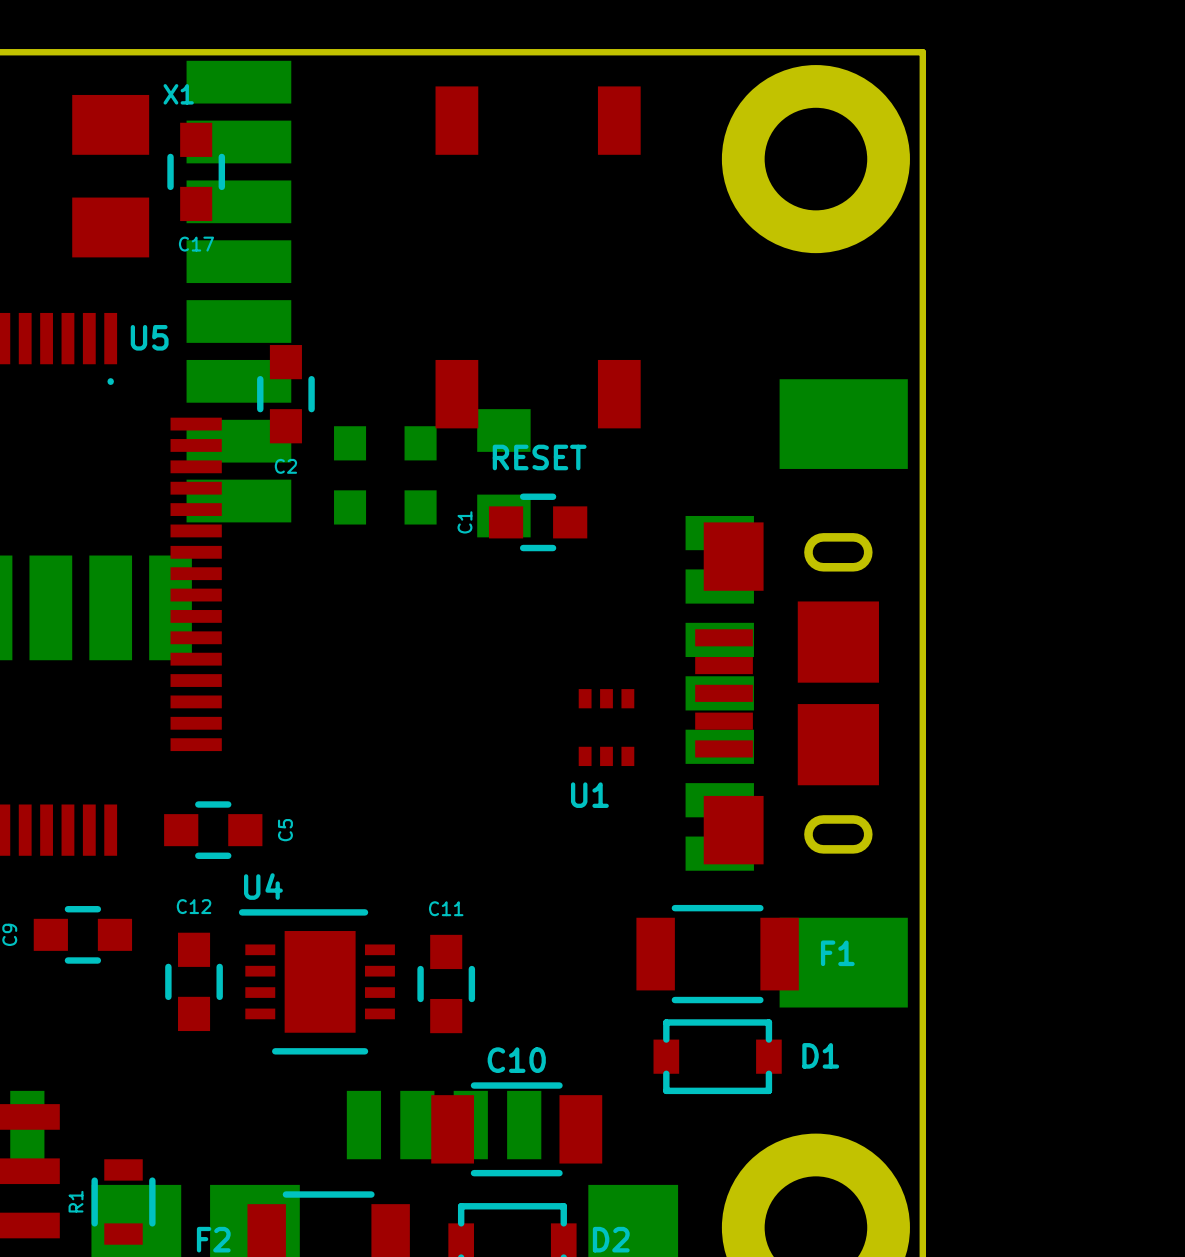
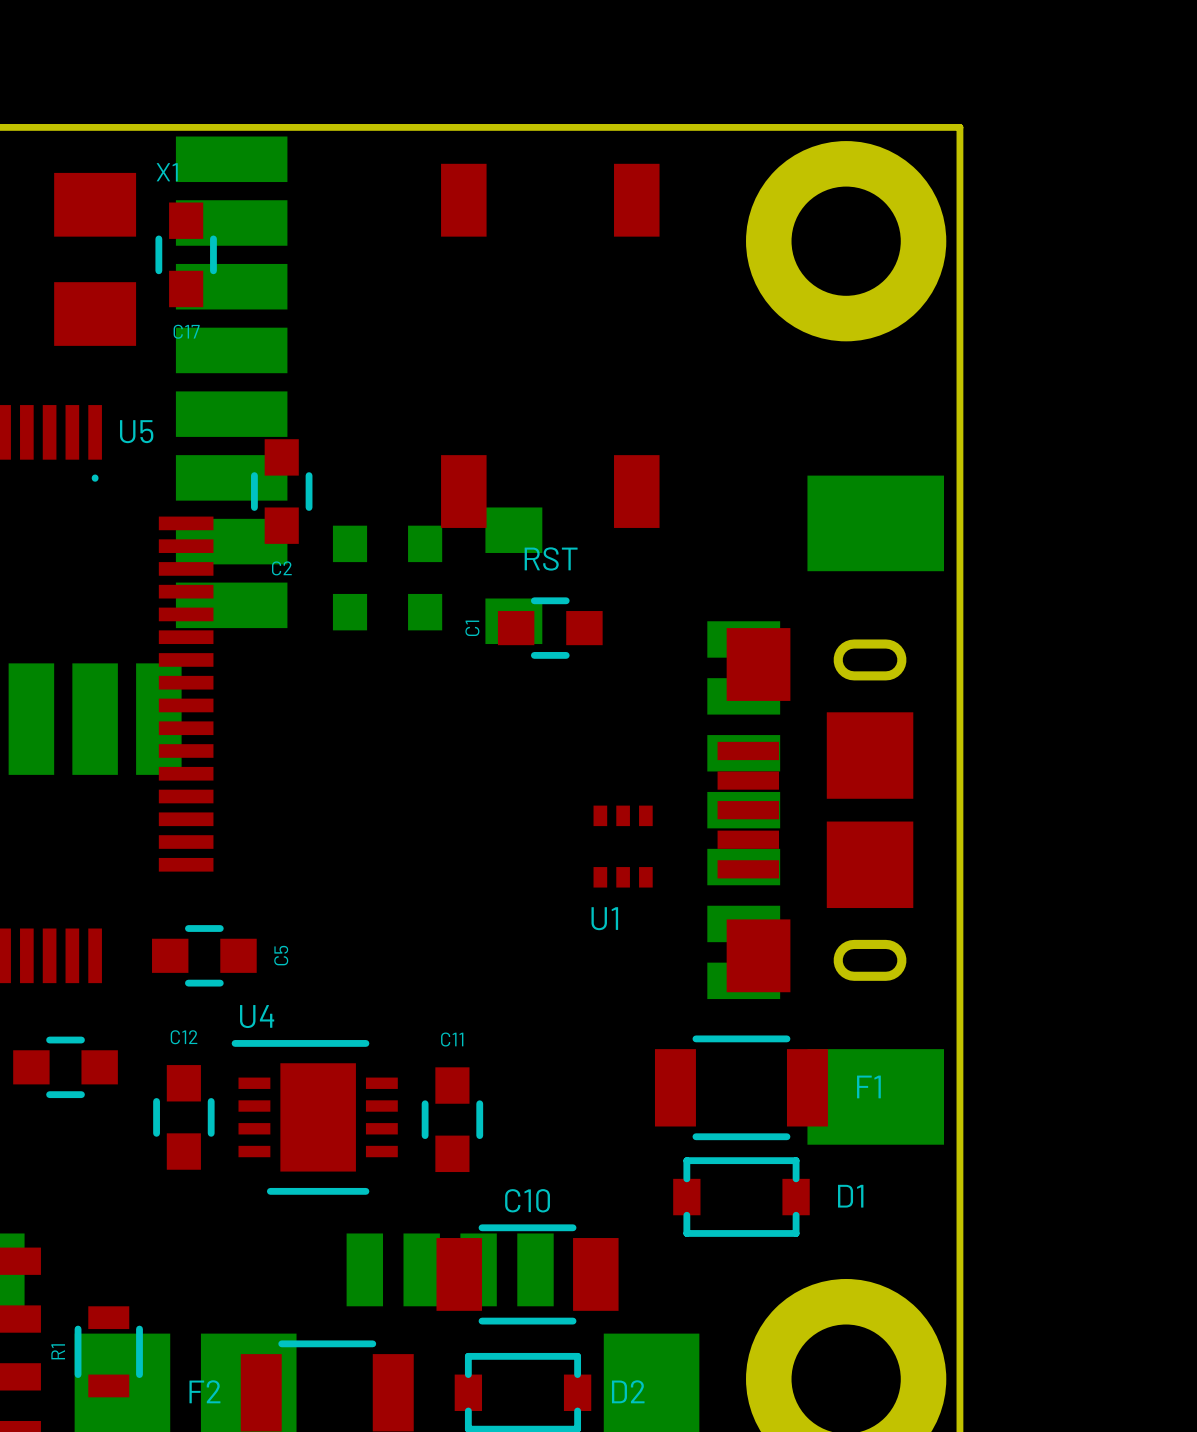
part value: RESET (539, 457) -> RST (551, 558)

